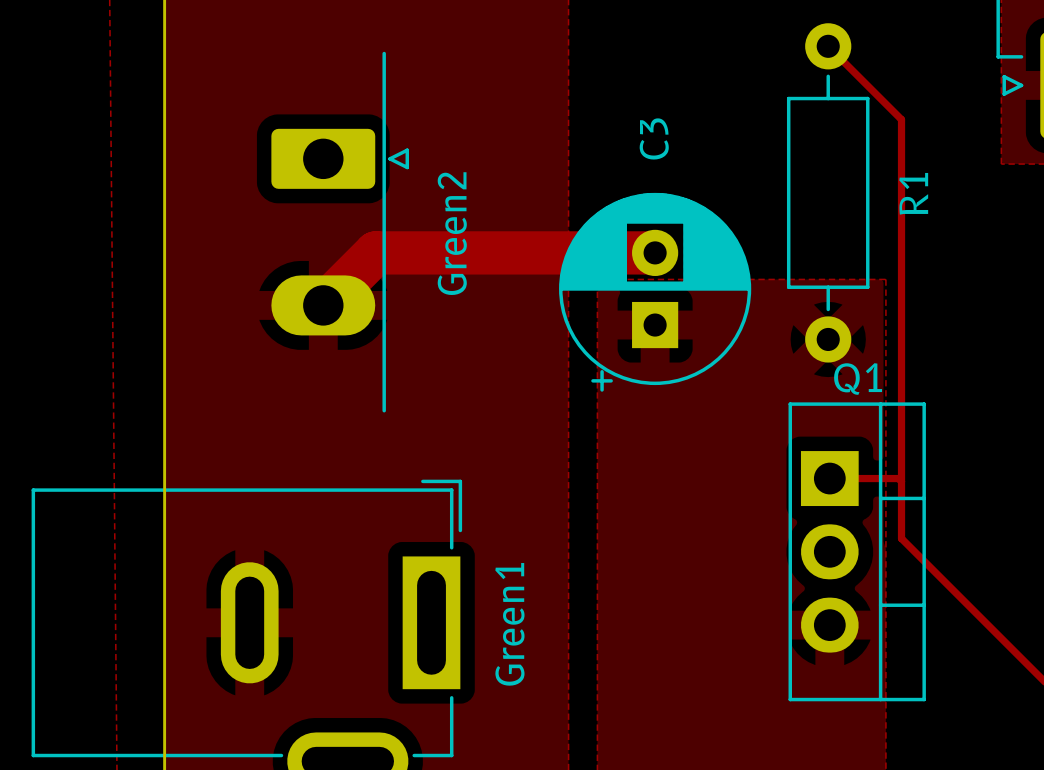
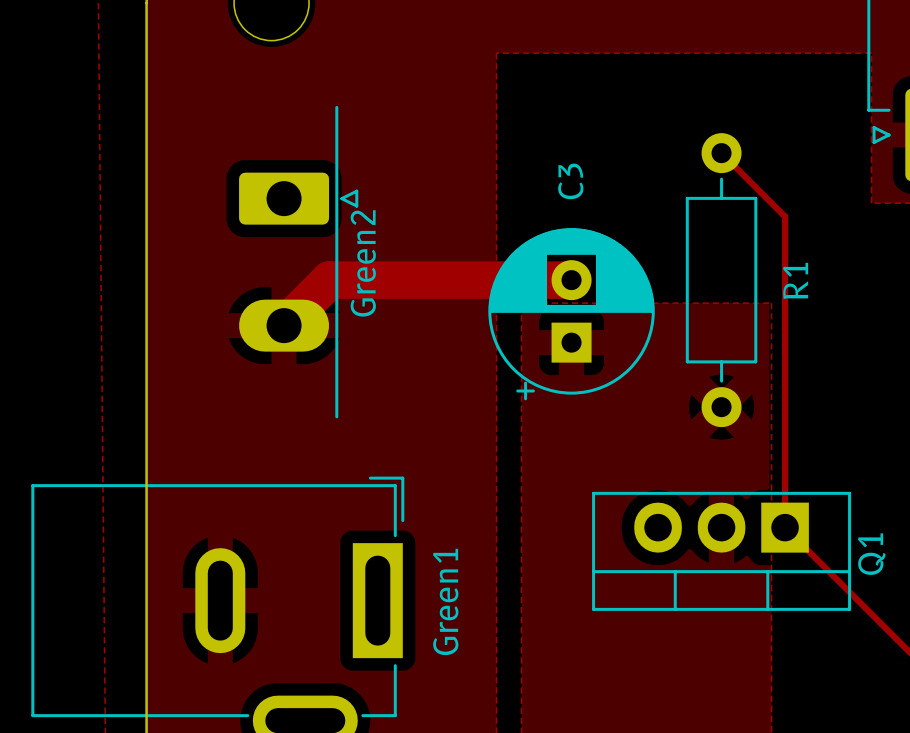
track: (828, 46) (901, 119) (901, 179) -> (721, 153) (785, 216)
R1 position: (828, 192) -> (721, 280)
Green2 name position: Green2 (452, 233) -> Green2 (363, 263)
track: (829, 478) (898, 478) (901, 481) -> none
Q1 rotation: 0° (857, 551) -> 90° clockwise (721, 551)

